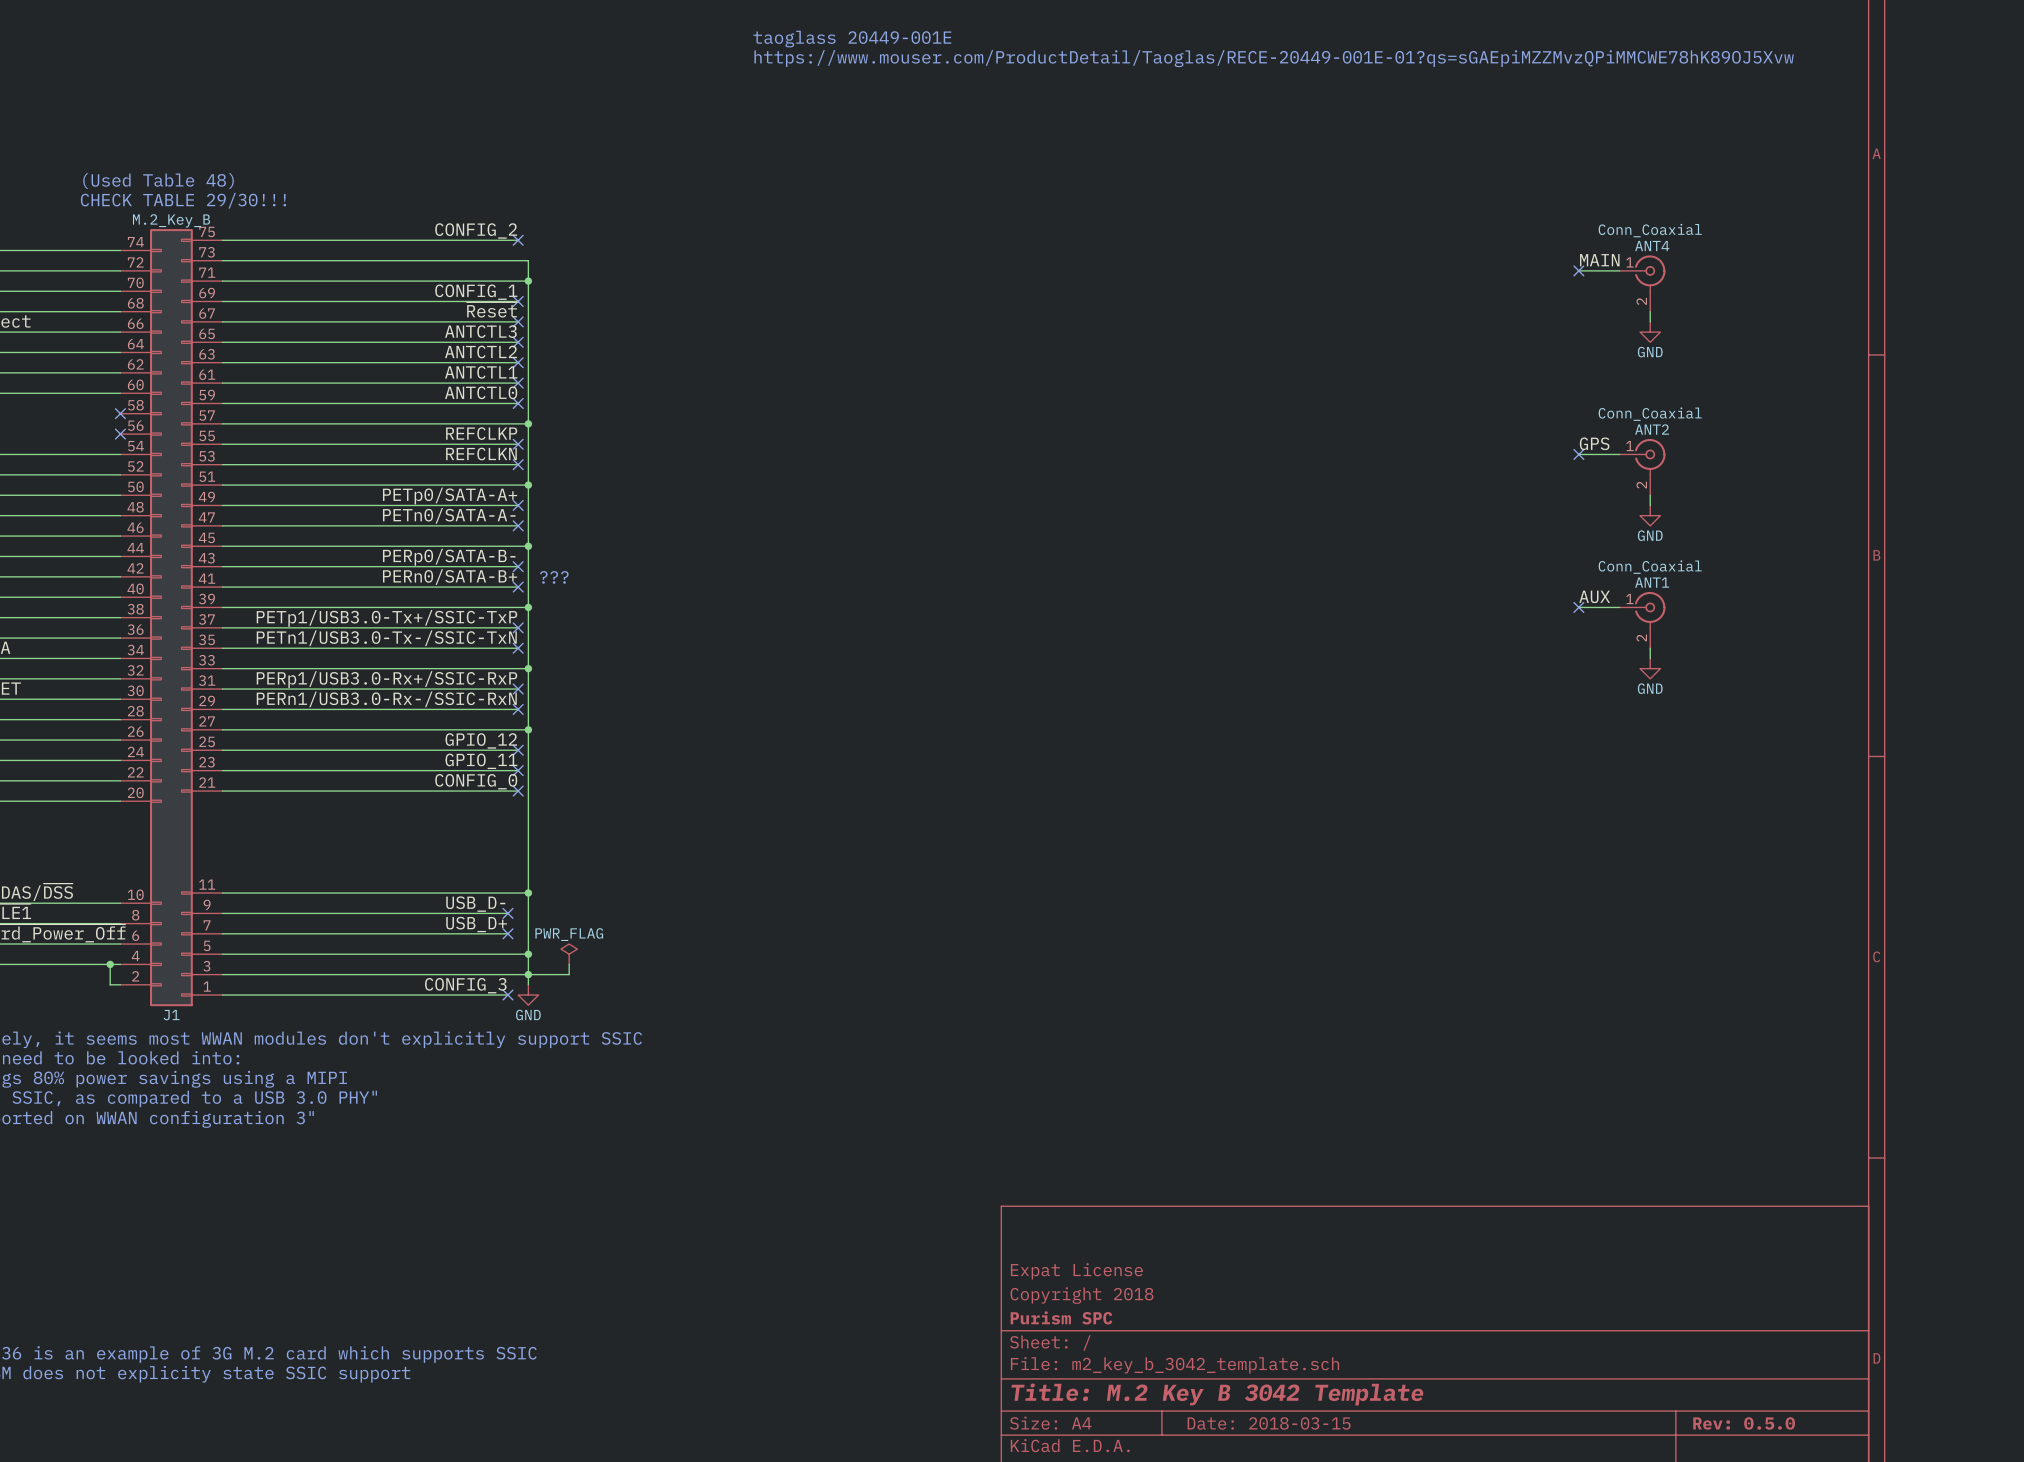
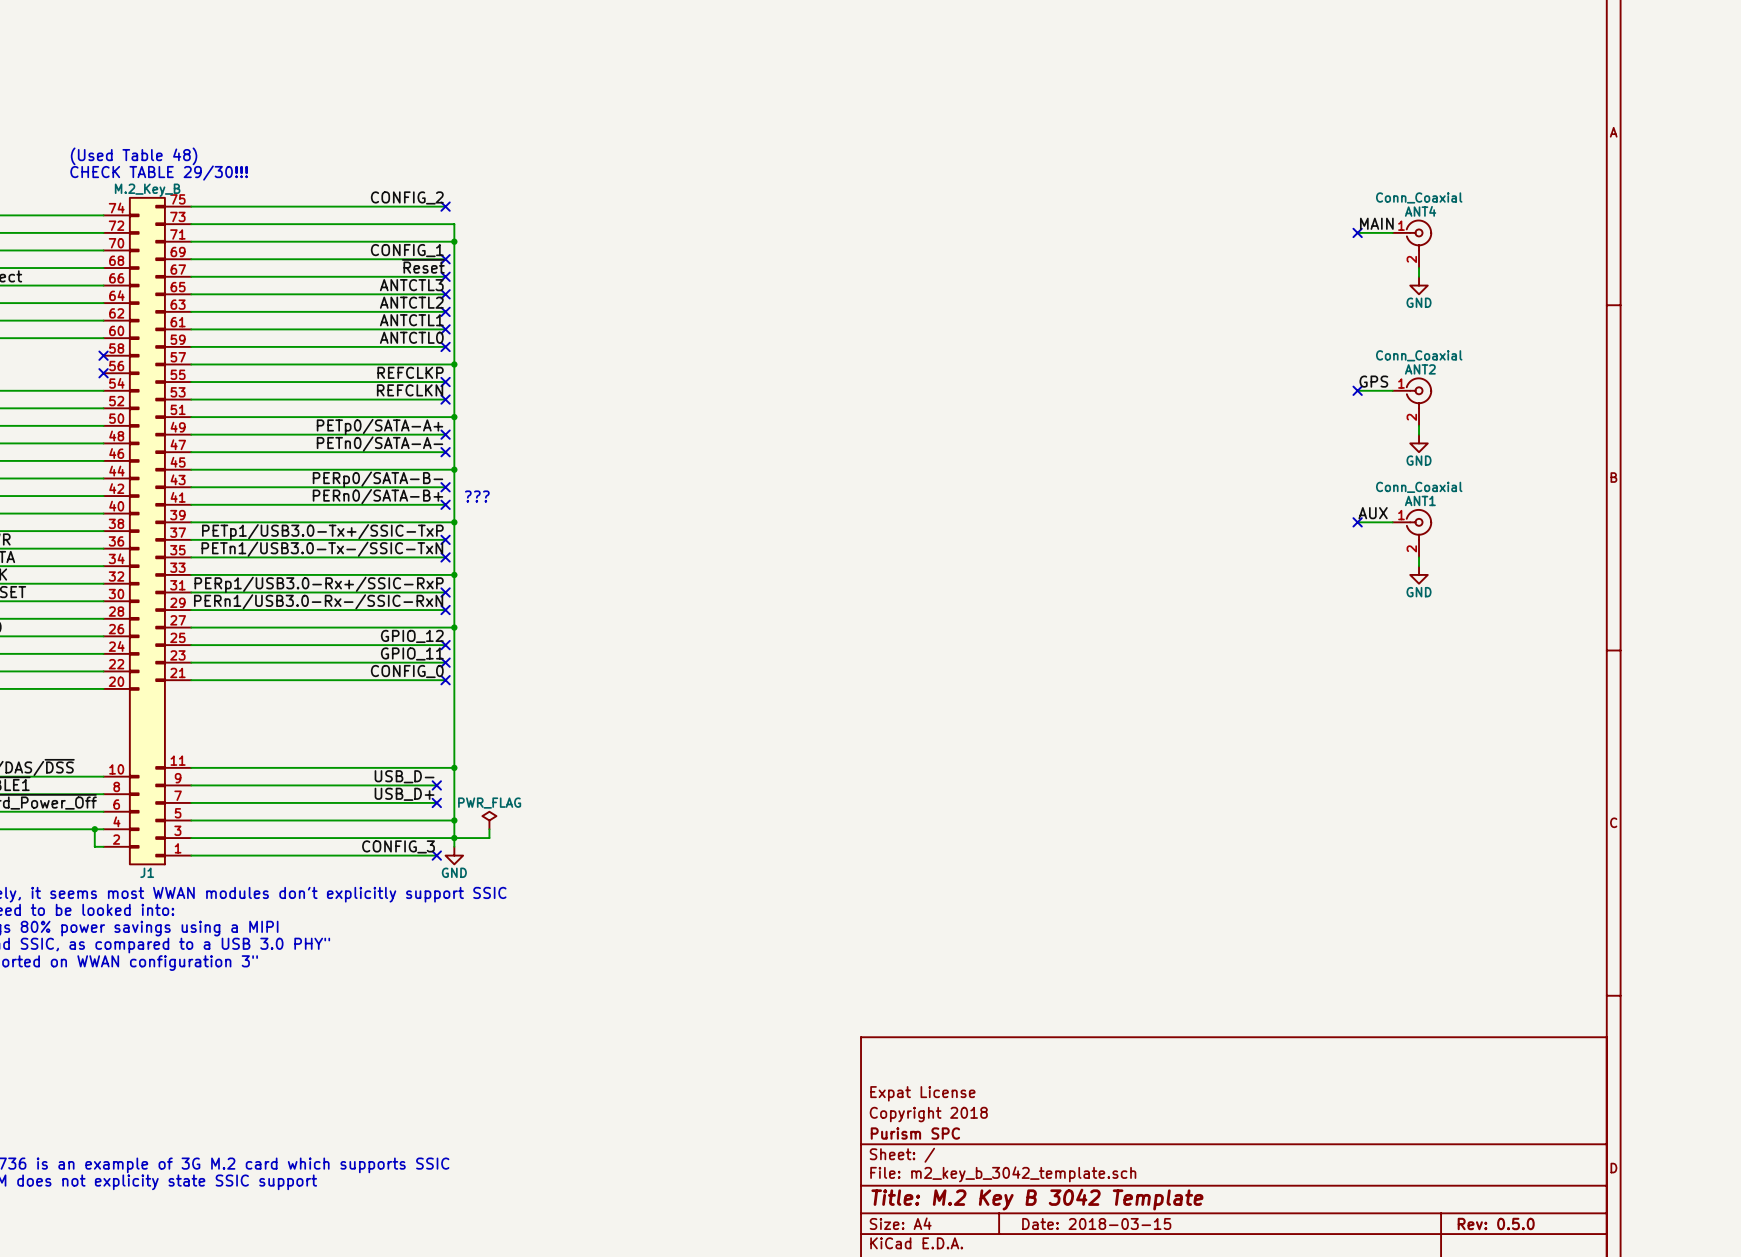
text: taoglass 20449-001E (852, 39) -> none
text: https://www.mouser.com/ProductDetail/Taoglas/RECE-20449-001E-01?qs=sGAEpiMZZMvzQPiMMCWE78hK89OJ5Xvw (1274, 58) -> none

